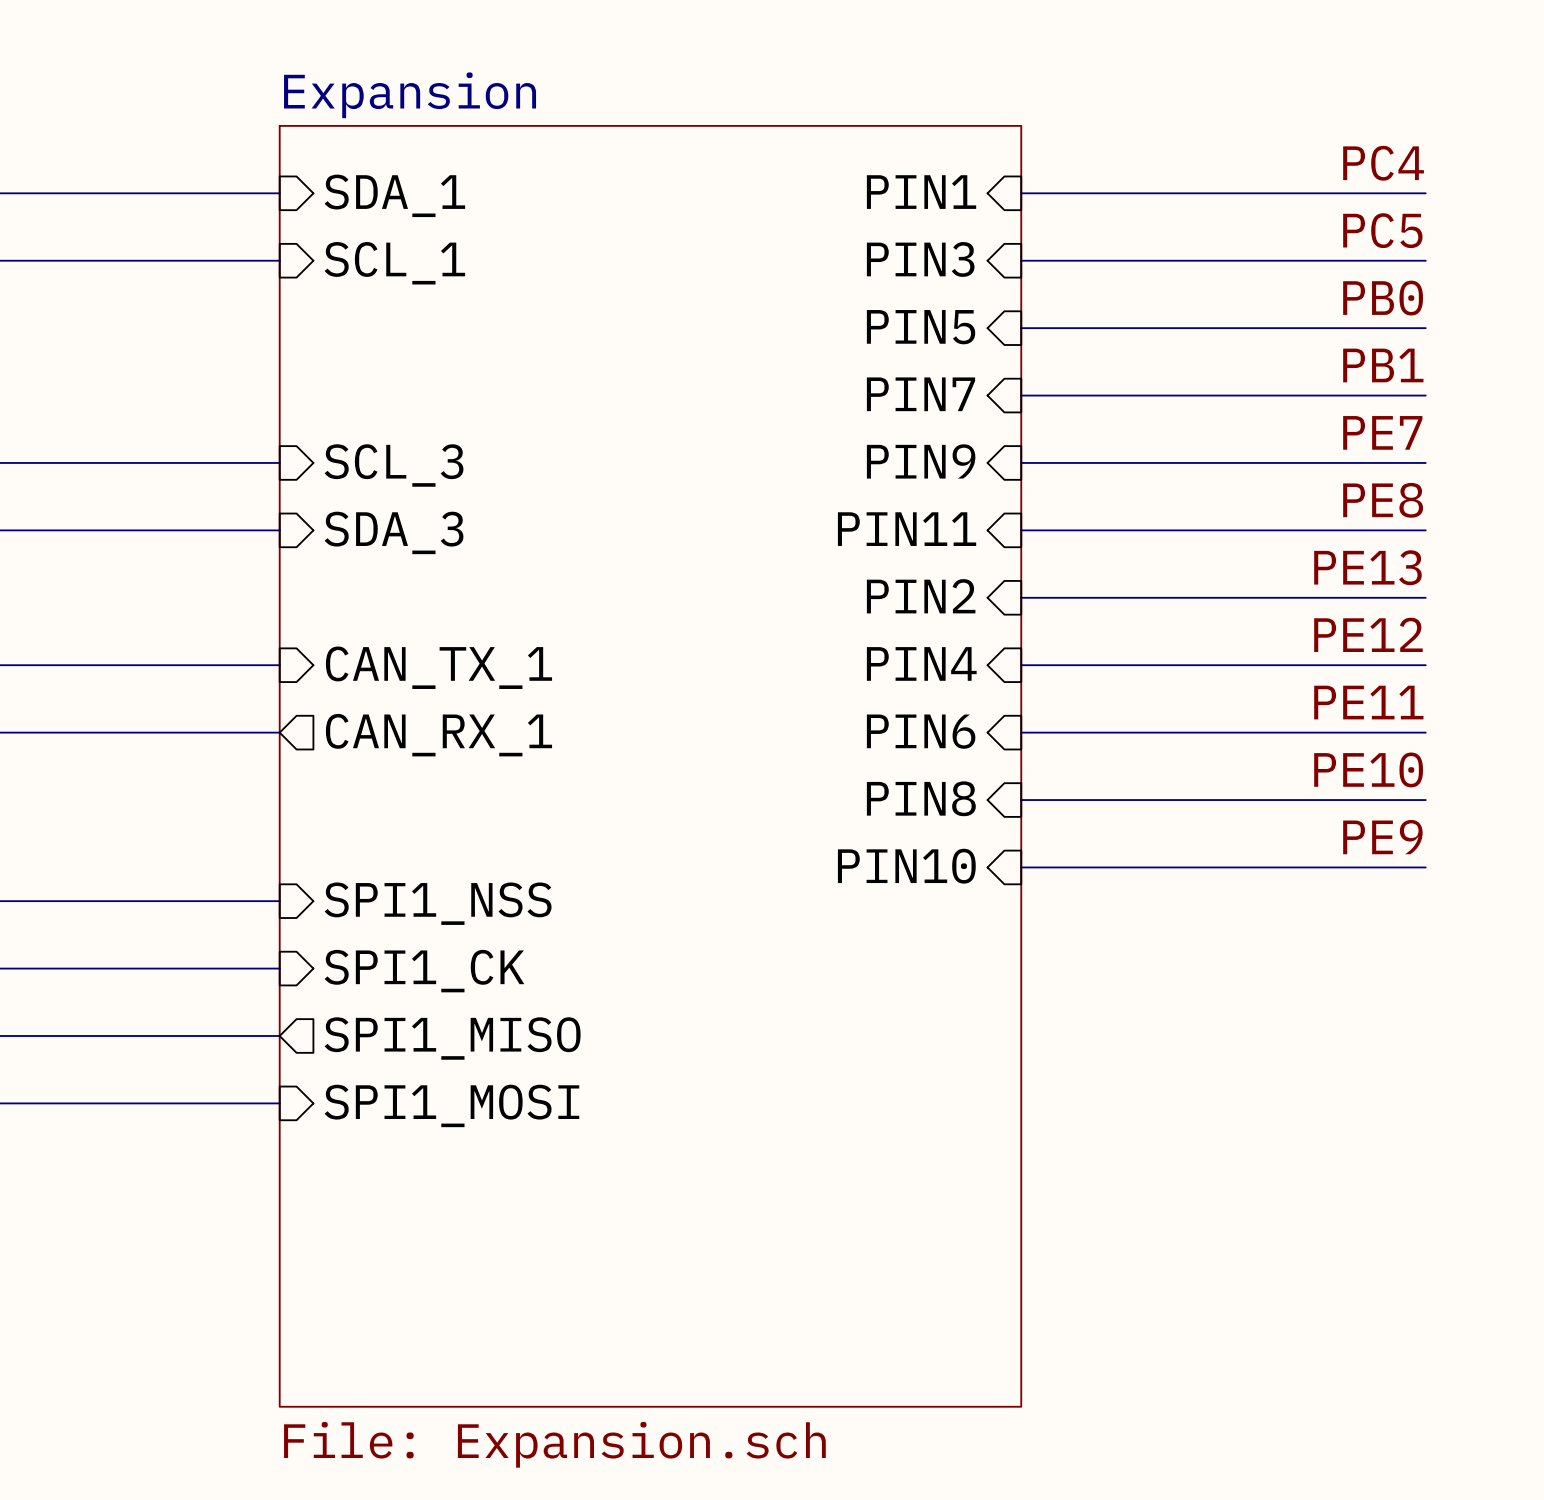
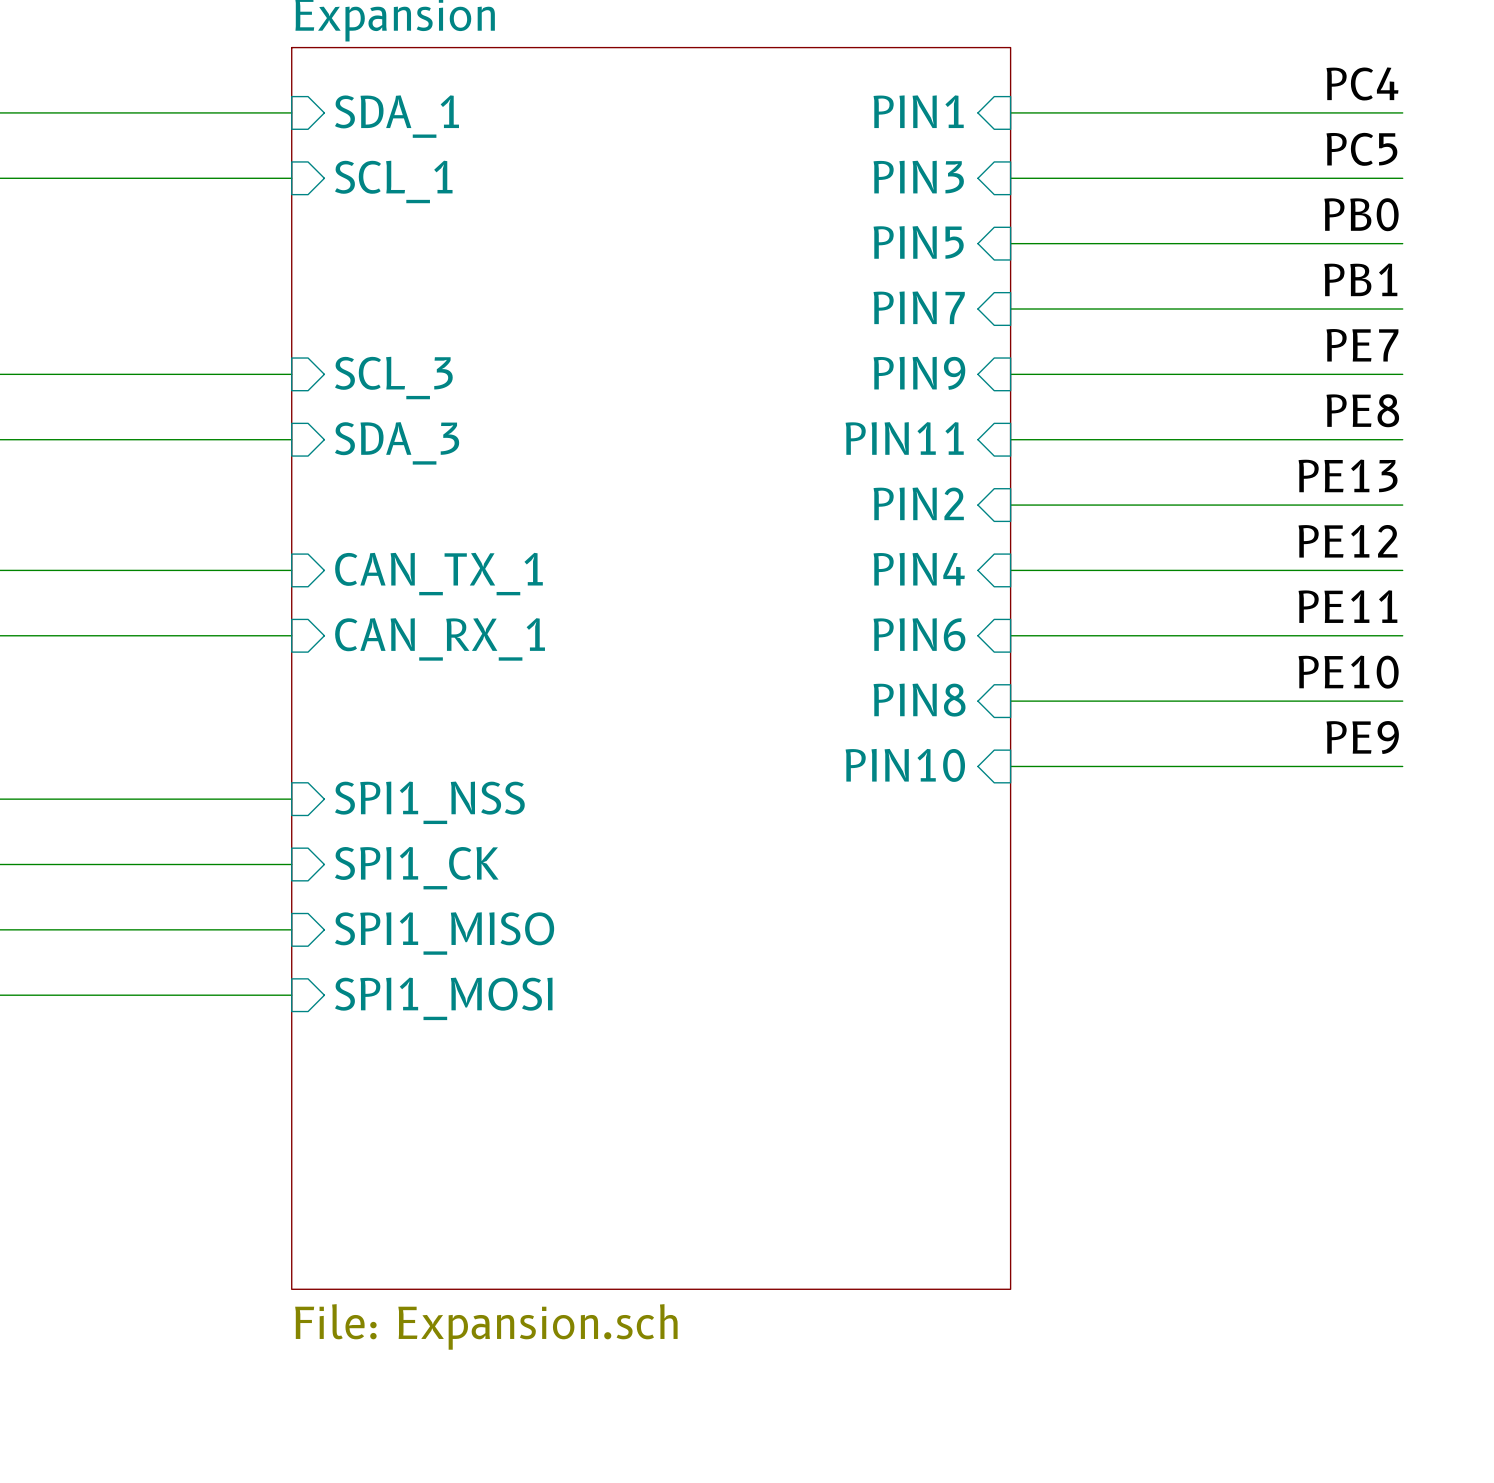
sheet pin shape: output (438, 735) -> input (440, 639)
sheet pin shape: output (452, 1038) -> input (444, 933)

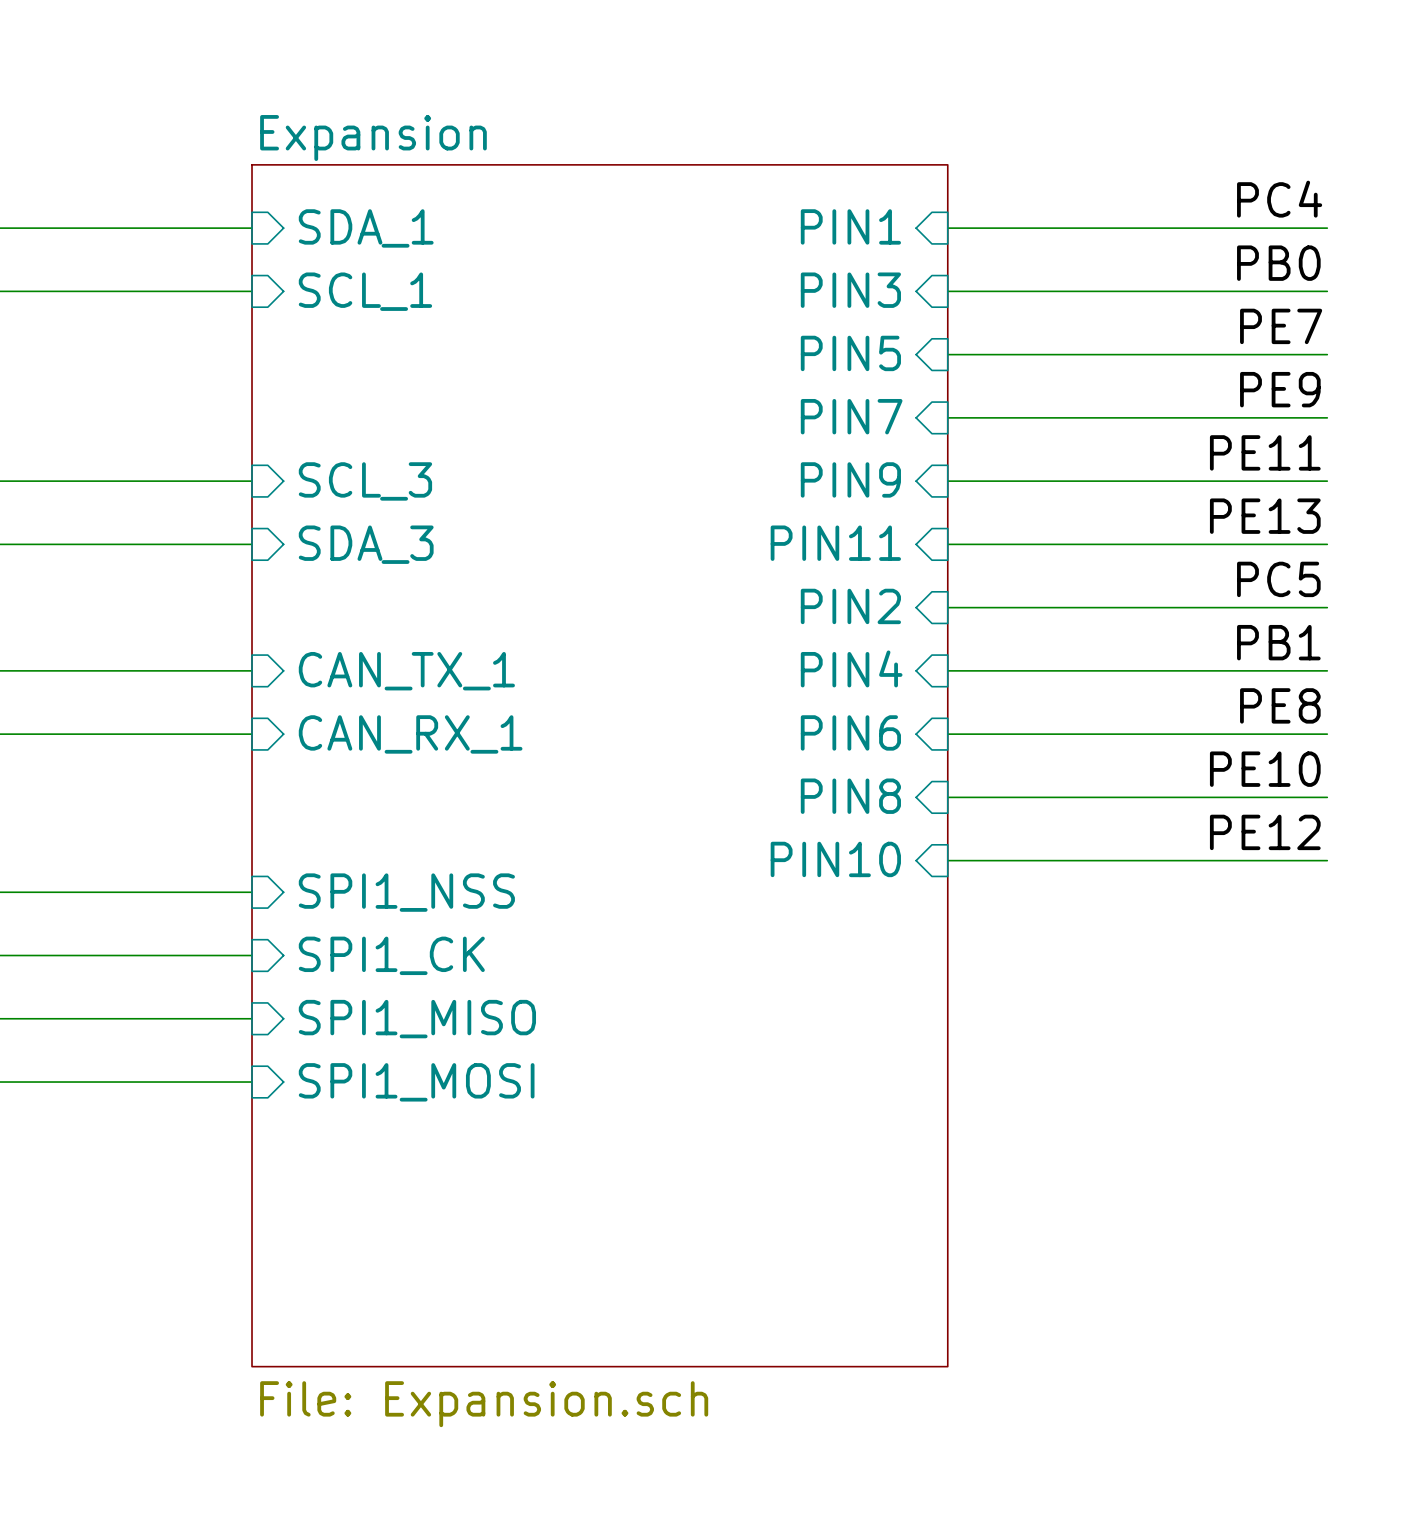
label: PC5 (1361, 149) -> PB0 (1278, 263)
label: PB0 (1361, 214) -> PE7 (1281, 326)
label: PB1 (1360, 279) -> PE9 (1280, 389)
label: PE7 (1362, 345) -> PE11 (1265, 452)
label: PE8 (1362, 410) -> PE13 (1265, 516)
label: PE13 (1348, 475) -> PC5 (1278, 579)
label: PE12 (1348, 541) -> PB1 (1278, 642)
label: PE11 (1347, 606) -> PE8 (1280, 705)
label: PE9 (1362, 737) -> PE12 (1265, 832)

